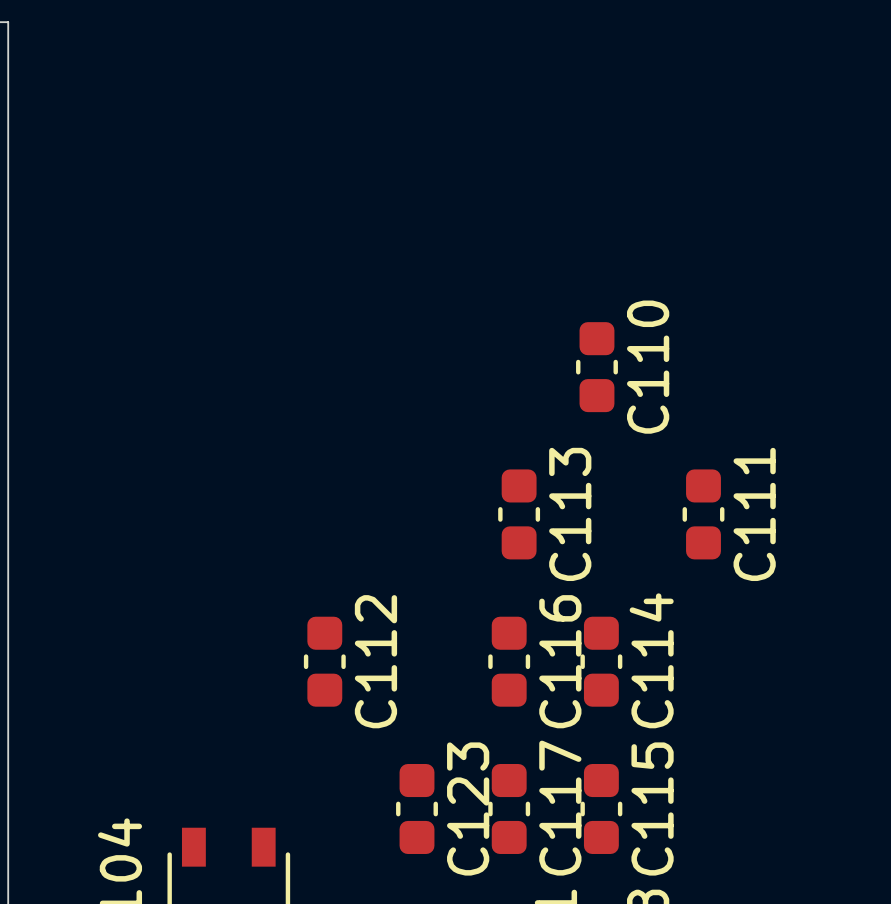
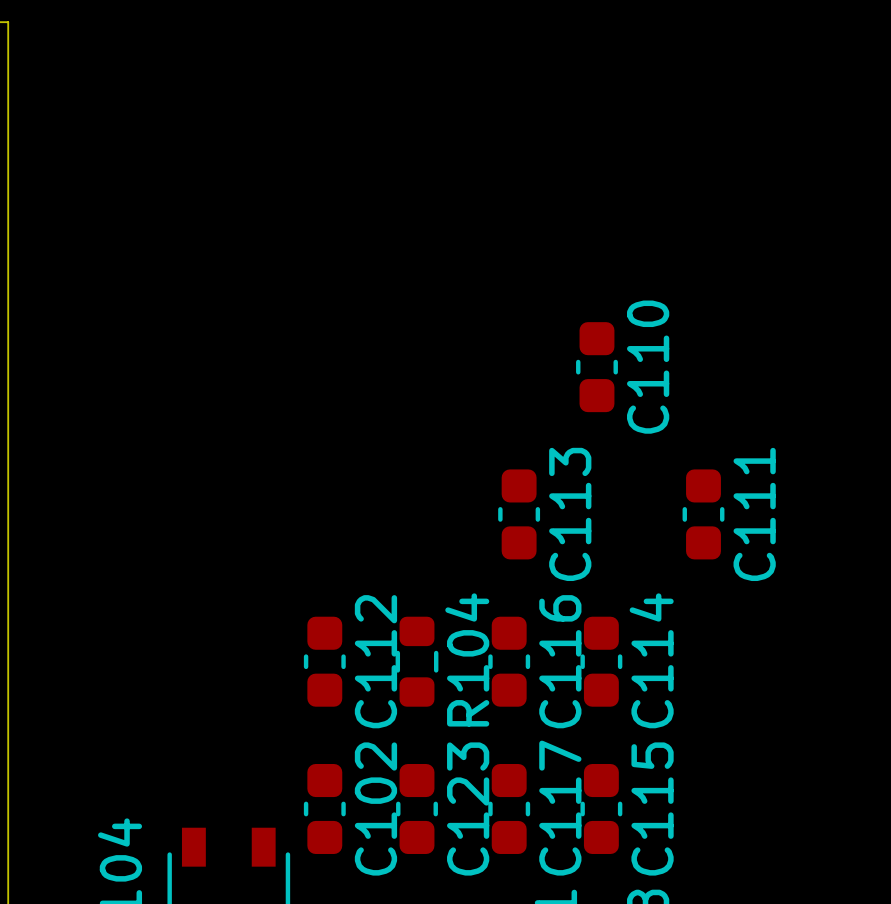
R104: none -> (417, 661)
C102: none -> (324, 808)

